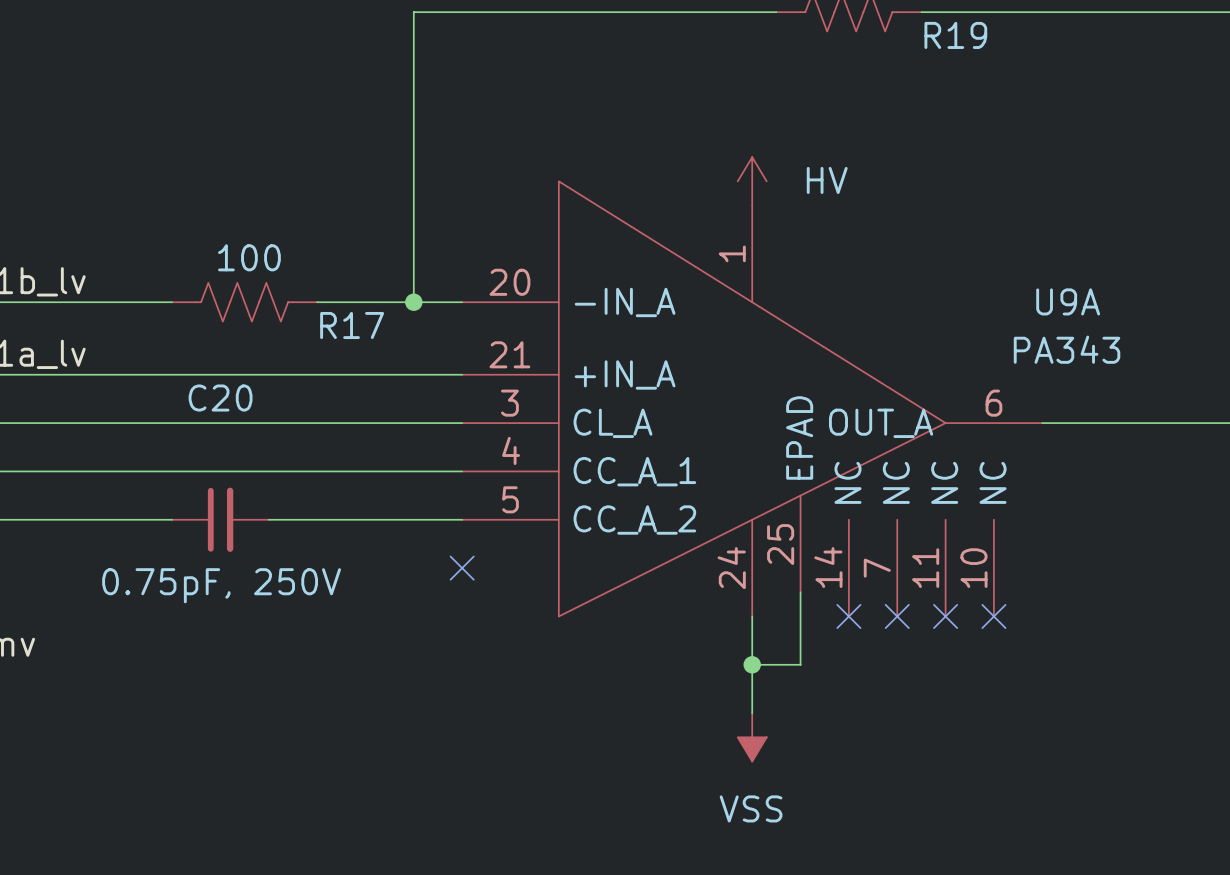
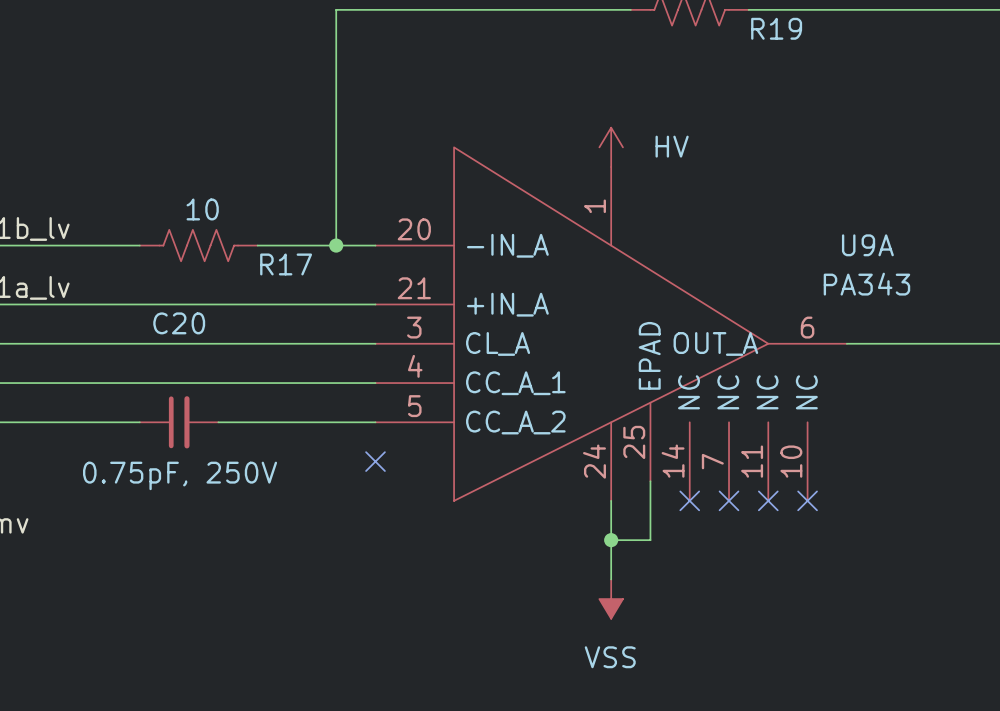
R17 value: 100 (249, 257) -> 10 (202, 209)

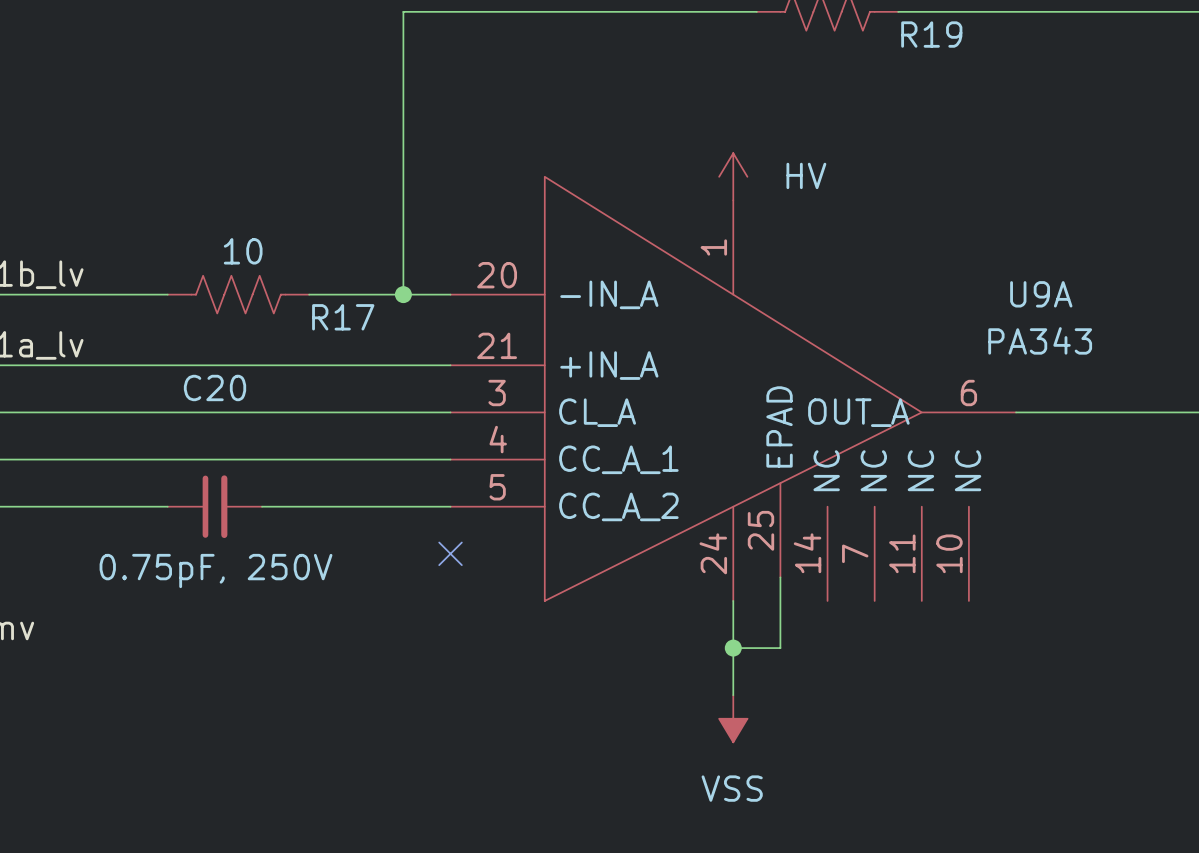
no-connect mark: (689, 500) -> none
no-connect mark: (729, 500) -> none
no-connect mark: (768, 500) -> none
no-connect mark: (807, 500) -> none

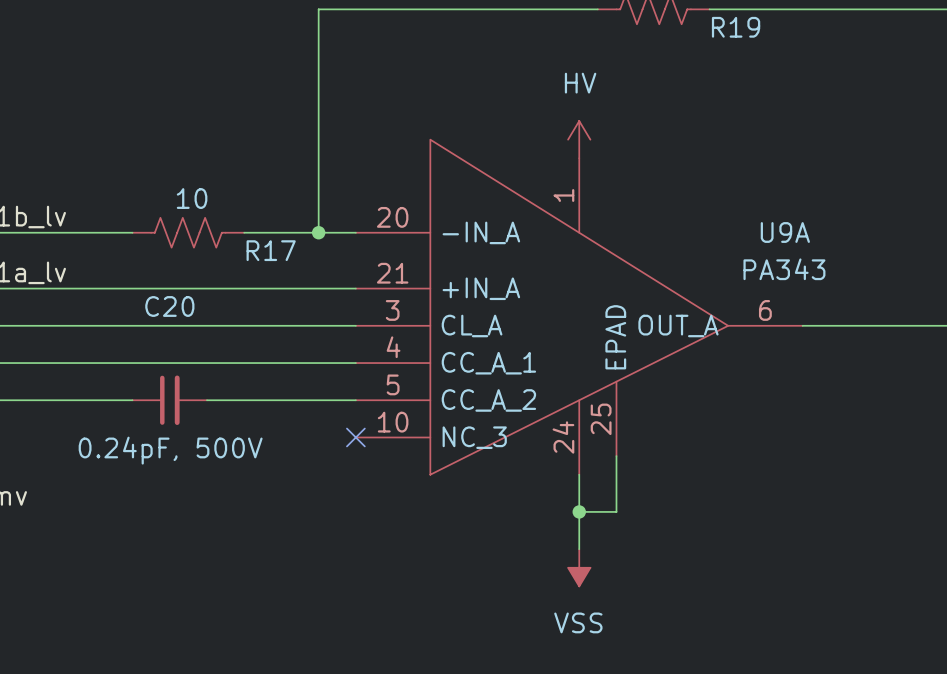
power symbol text position: HV (806, 175) -> HV (580, 83)
U9A symbol: [450, 176, 1017, 601] -> [355, 139, 803, 475]
U9A name position: U9A (1041, 294) -> U9A (785, 232)
U9A value position: PA343 (1040, 340) -> PA343 (784, 269)
C20 value: 0.75pF, 250V (216, 571) -> 0.24pF, 500V (170, 450)

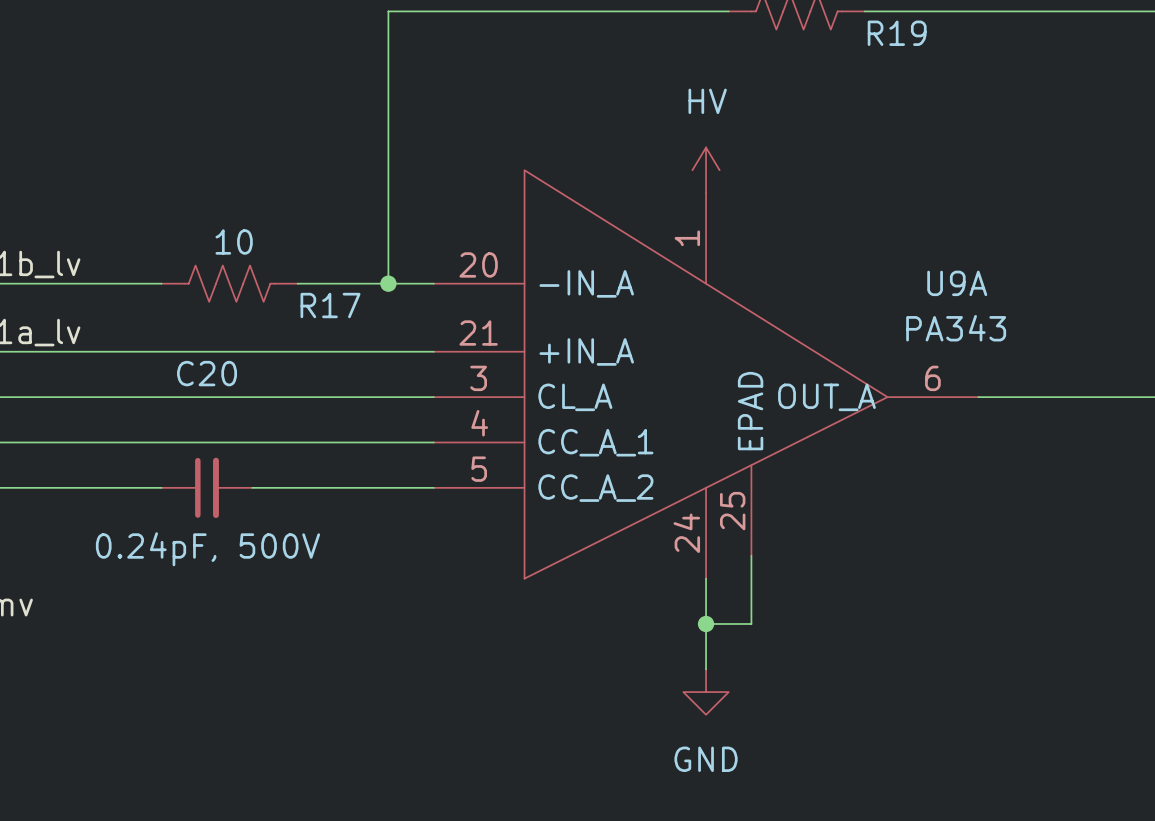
U9A symbol: [355, 139, 803, 475] -> [433, 170, 979, 579]
no-connect mark: (355, 437) -> none
power symbol: VSS (579, 567) -> GND (706, 692)

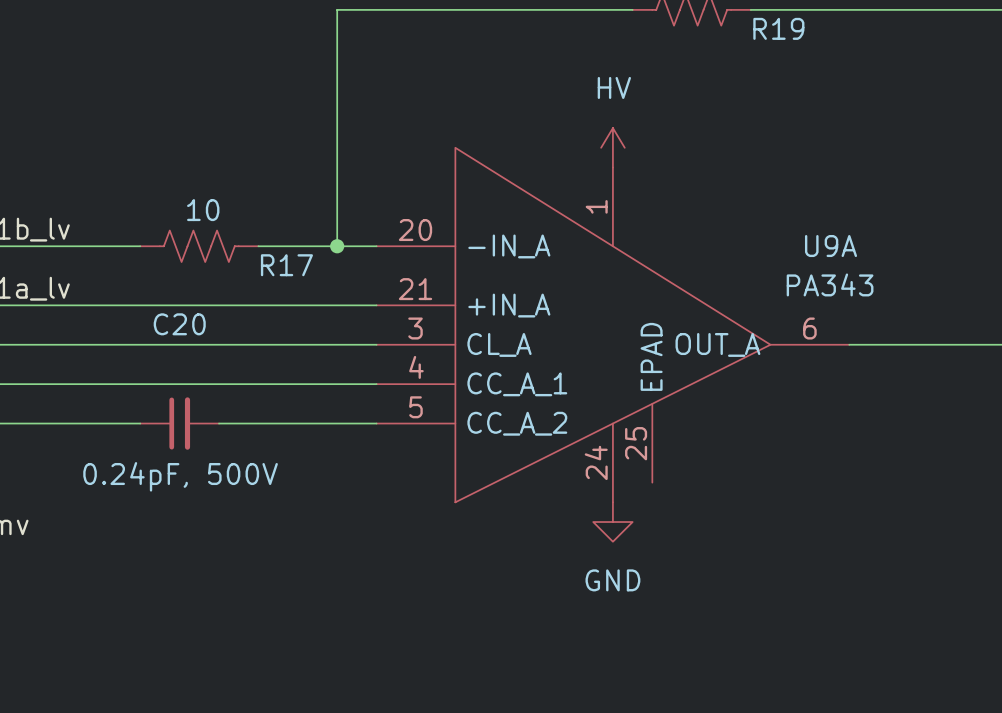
wire: (751, 555) (751, 623) (706, 623) -> none
wire: (706, 578) (706, 669) -> none
junction: (706, 623) -> none
power symbol position: GND (706, 692) -> GND (612, 522)

